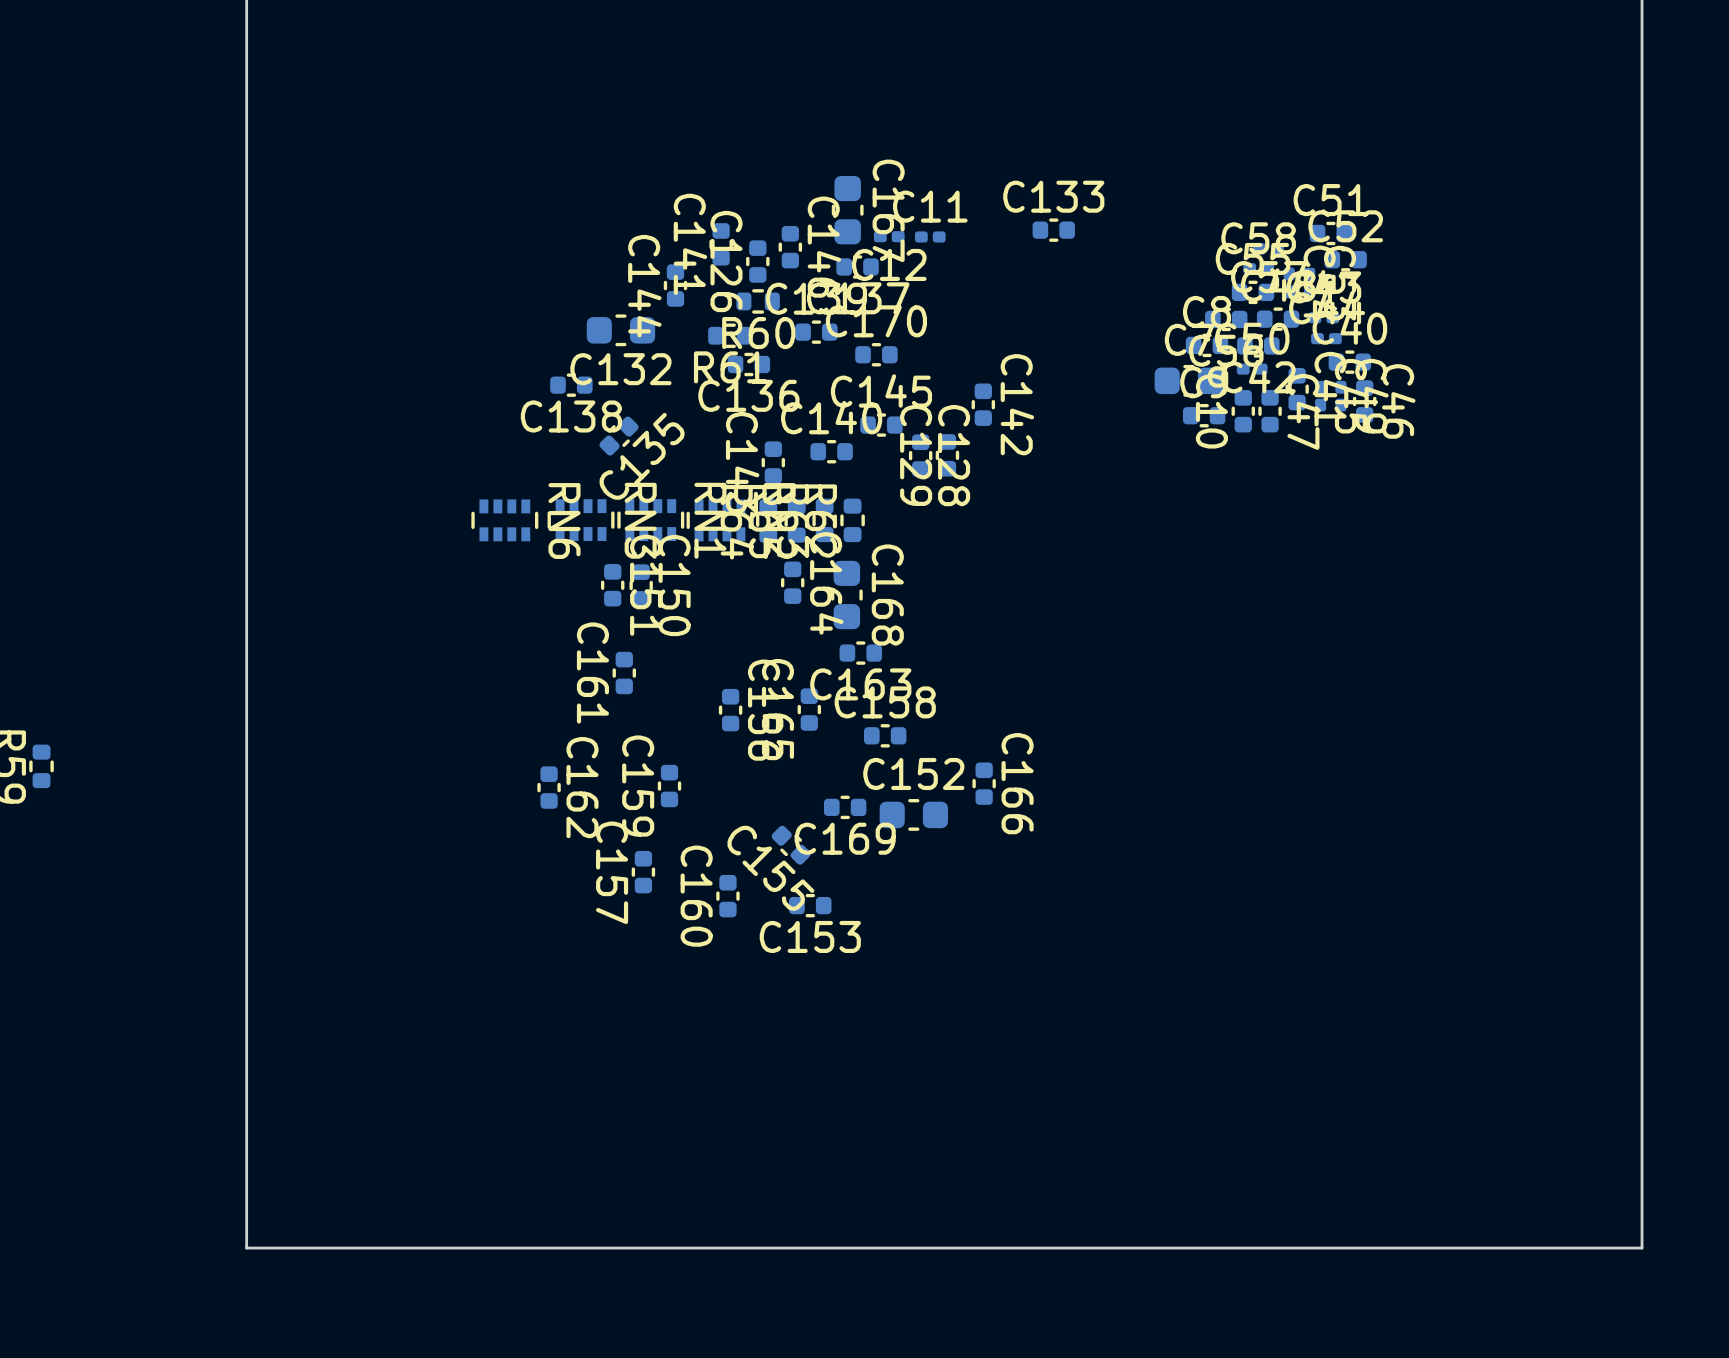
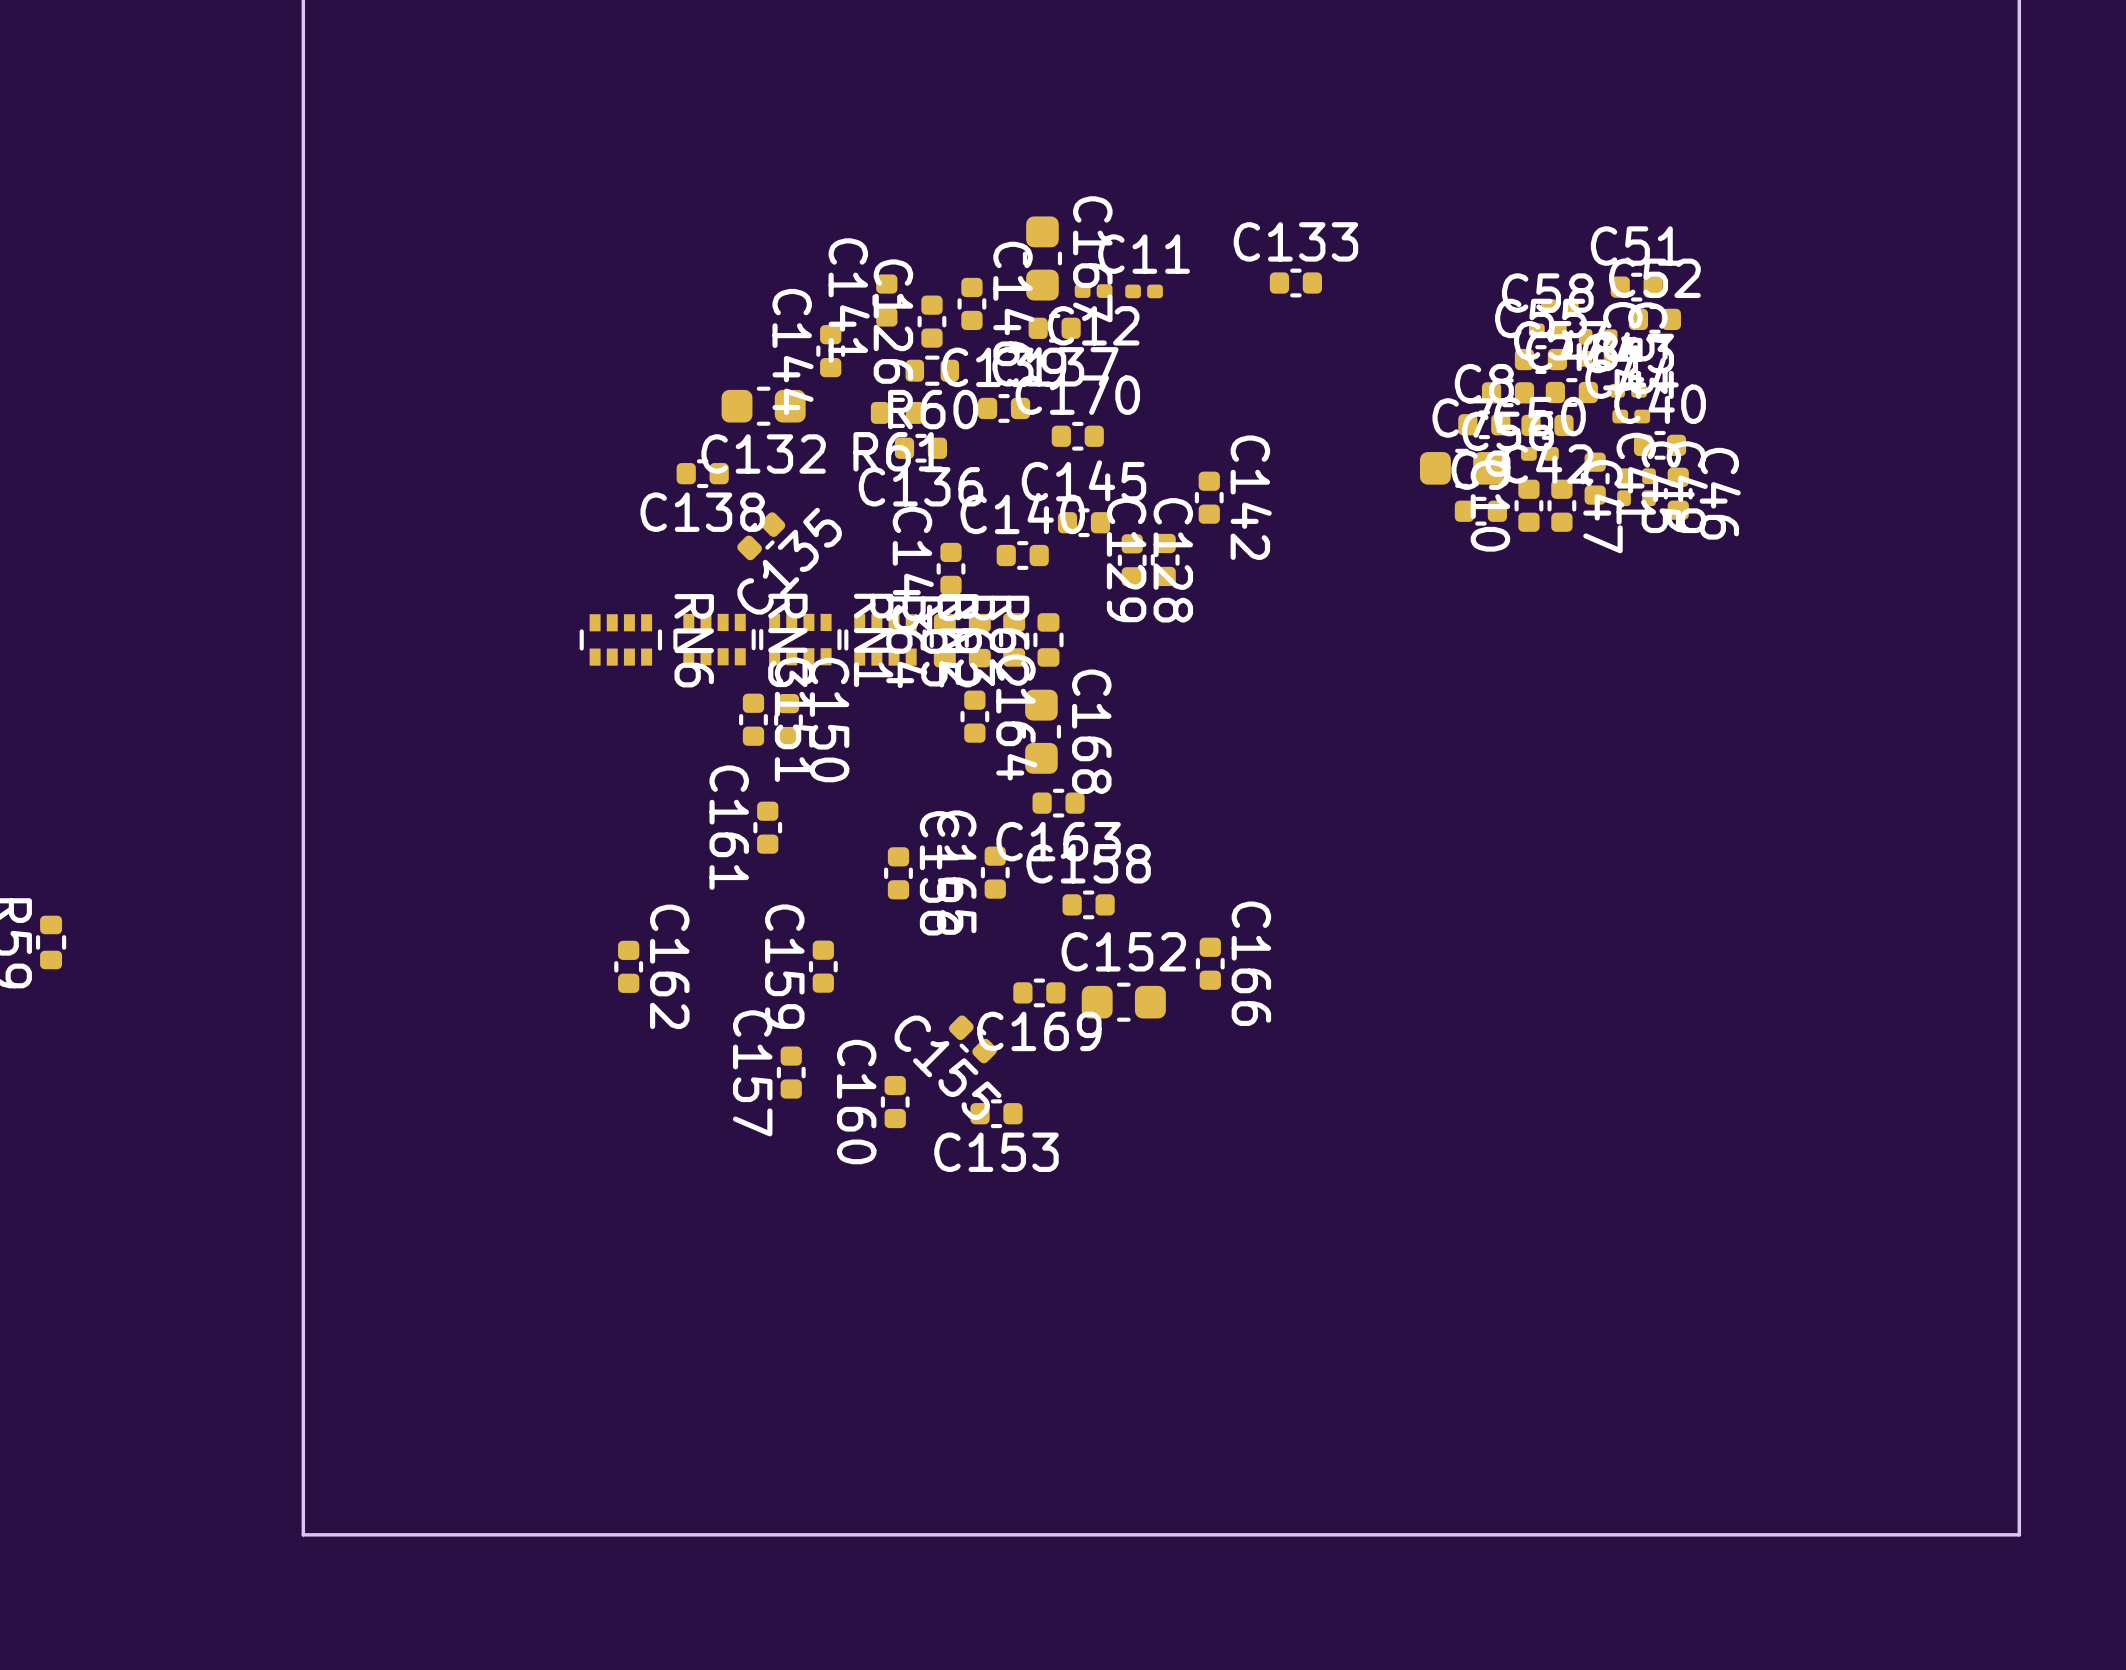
C162 position: (549, 787) -> (628, 966)

